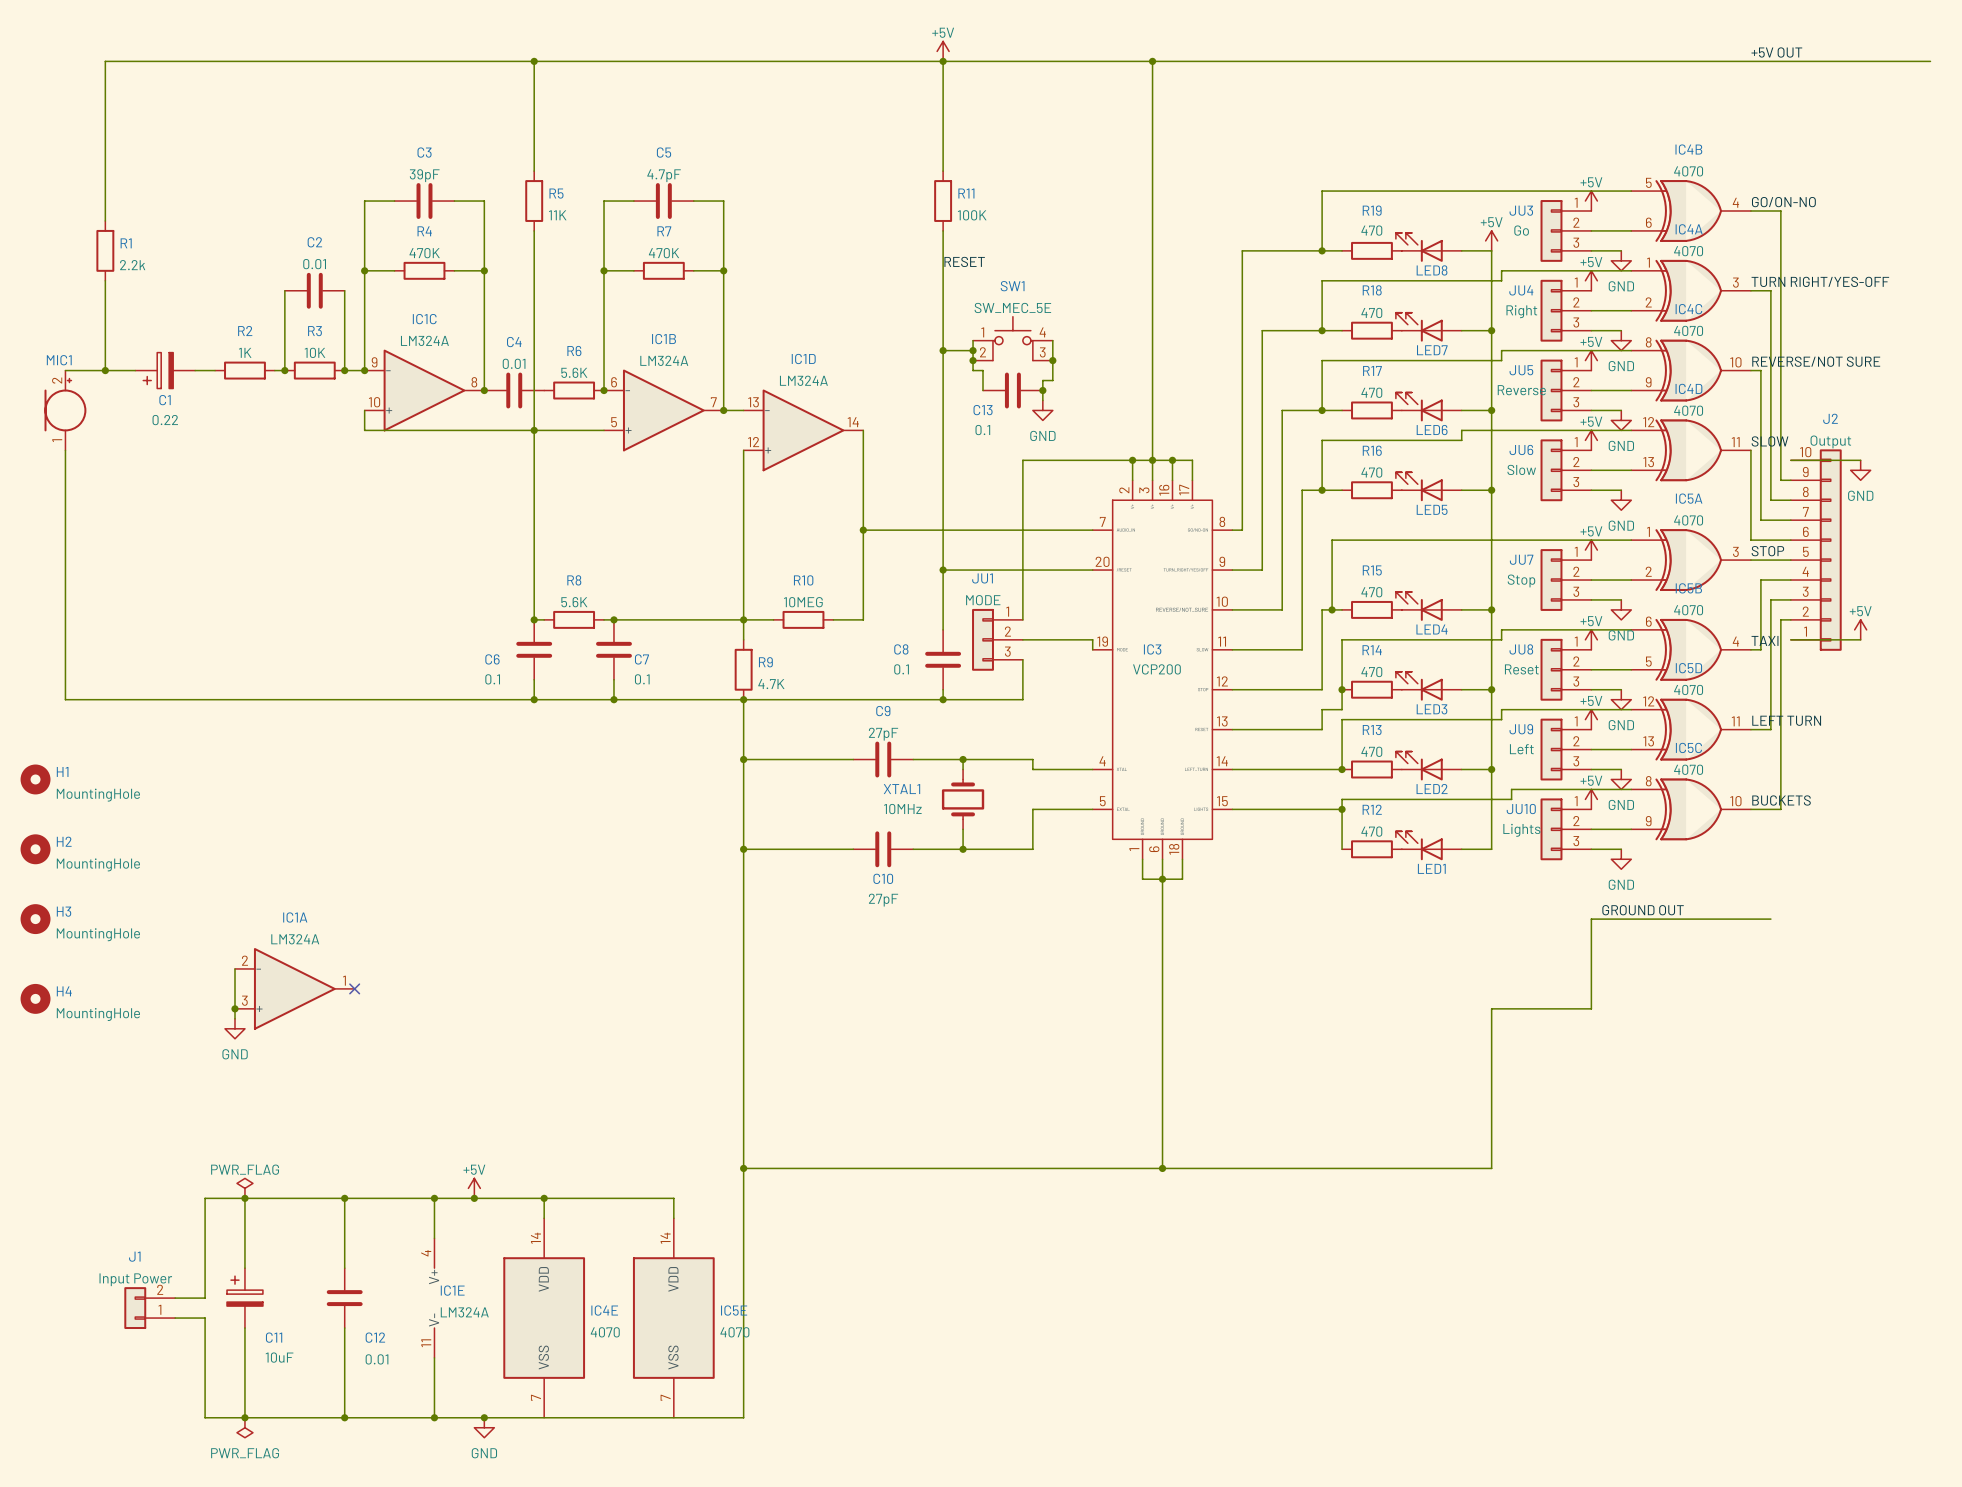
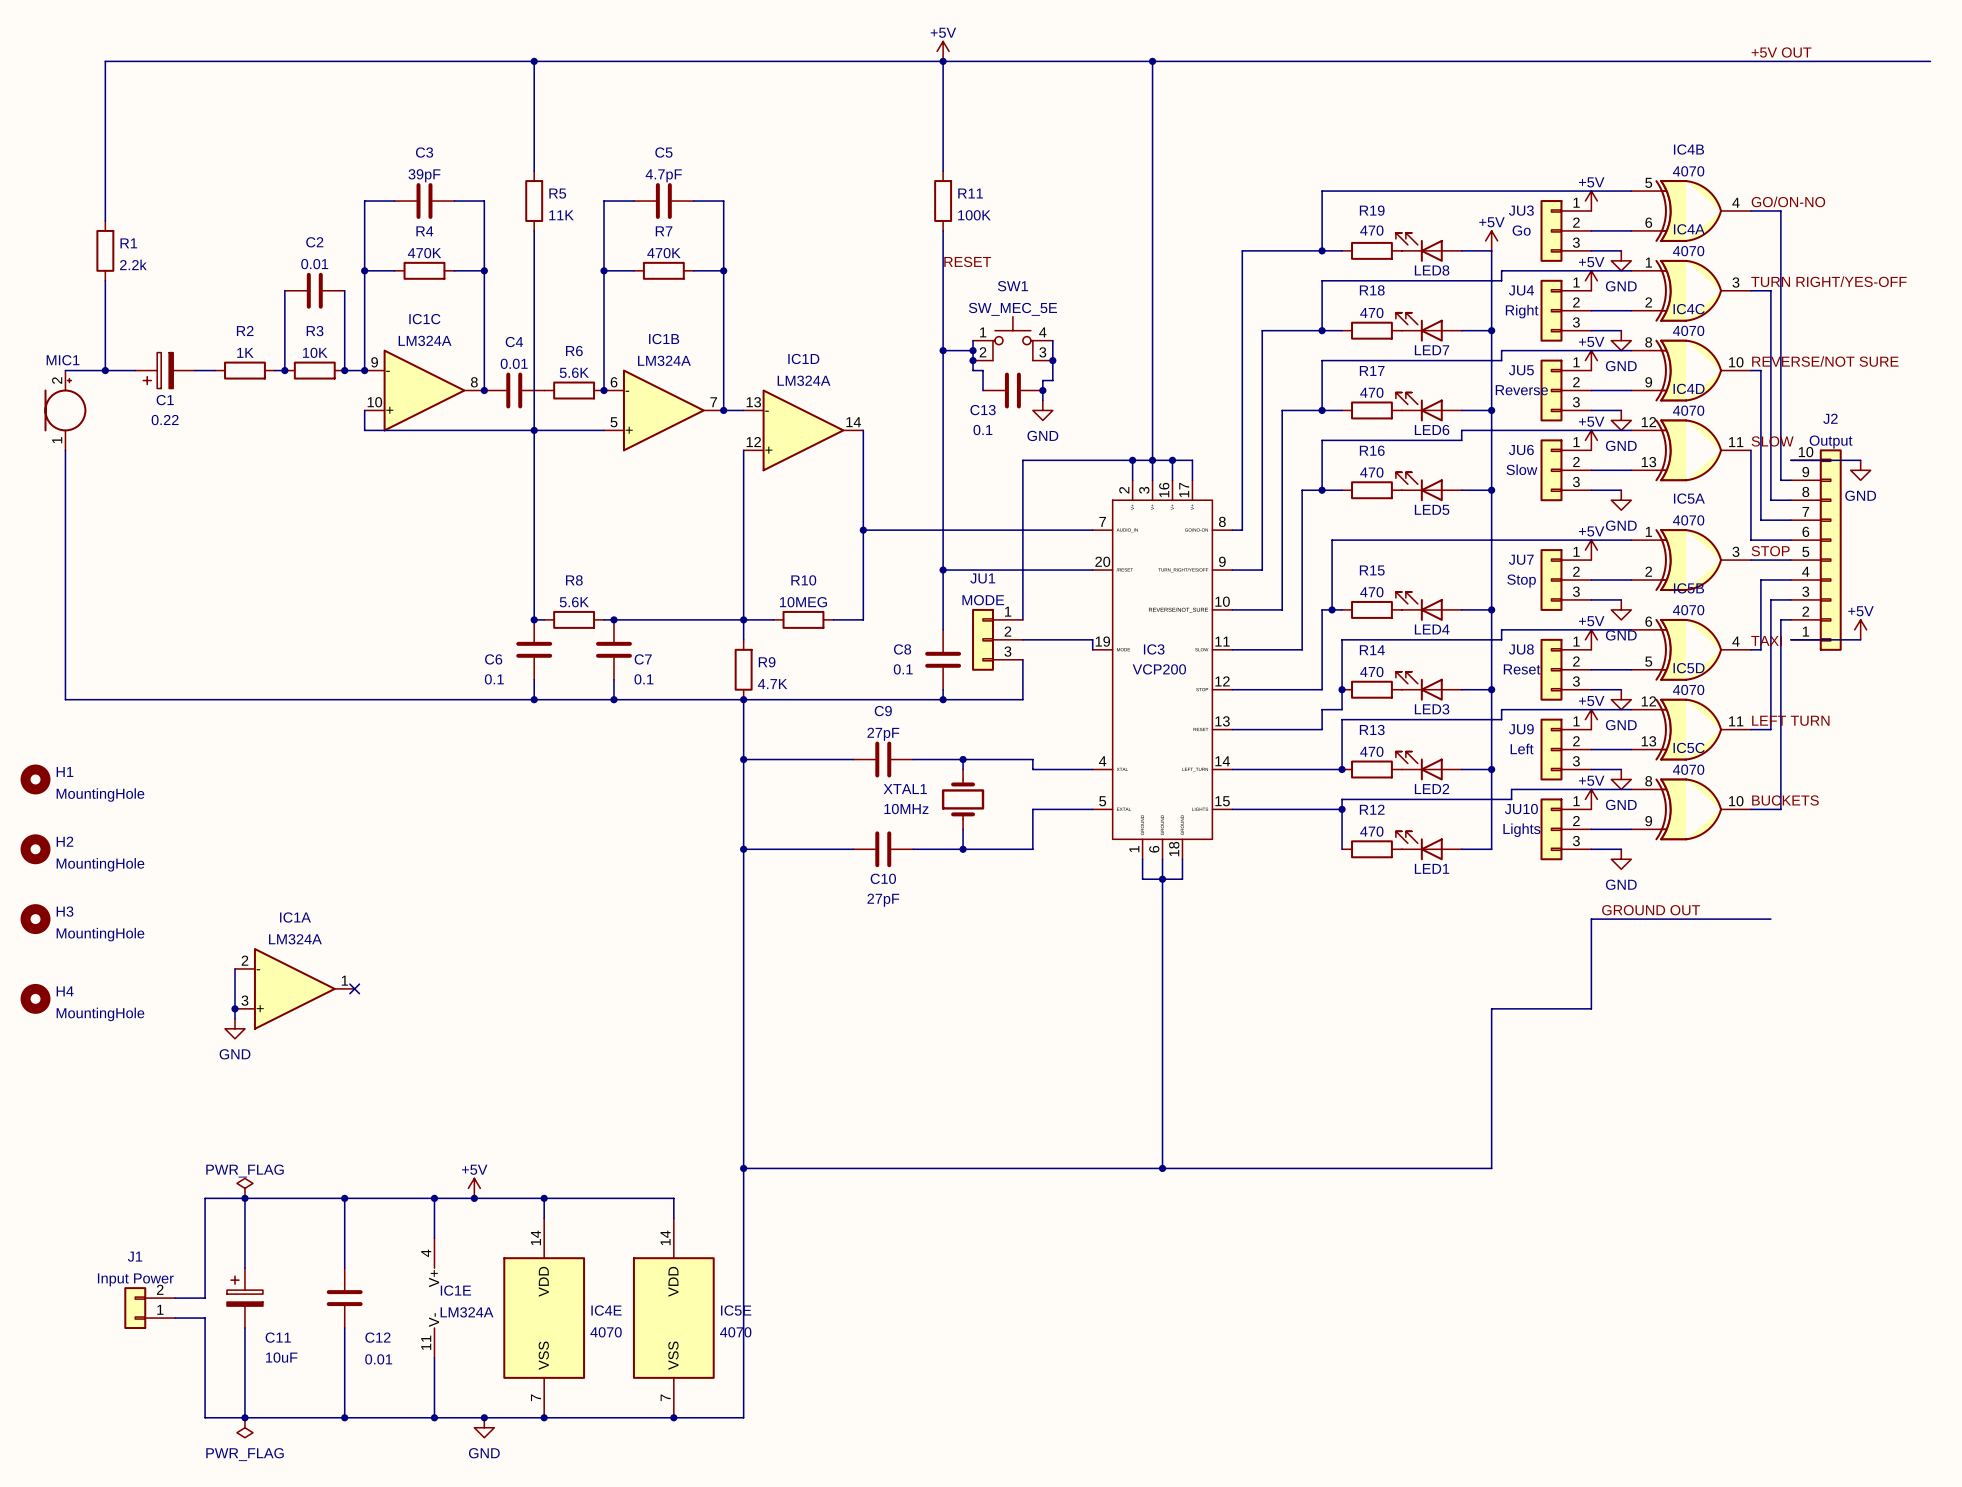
junction: none -> (544, 1417)
junction: none -> (673, 1417)

